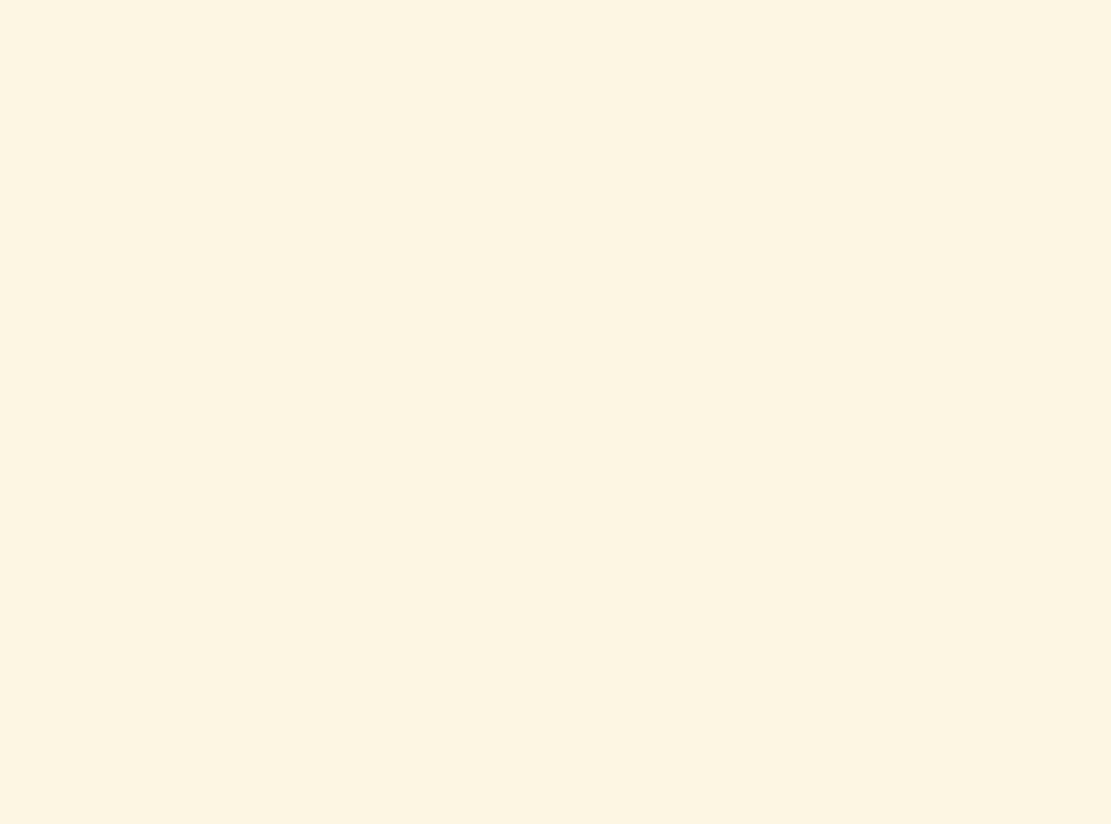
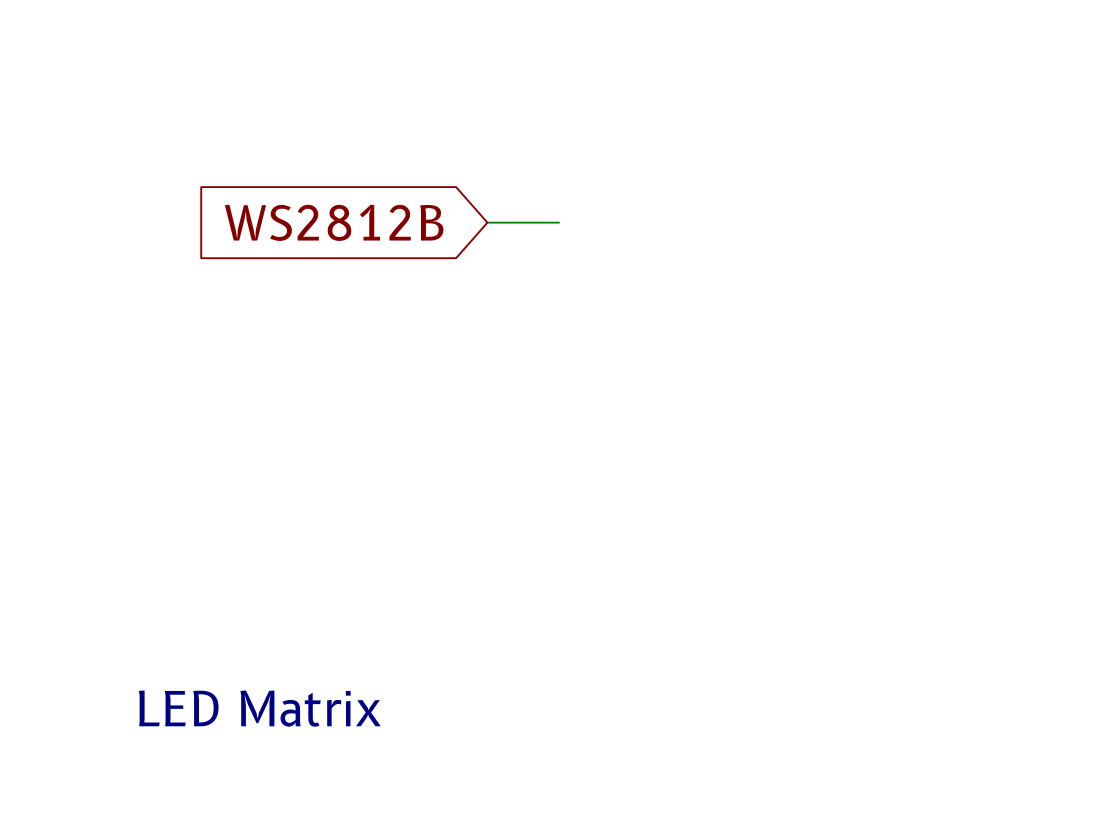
global label: none -> WS2812B (334, 222)
wire: none -> (487, 222) (559, 222)
text: none -> LED Matrix (259, 708)

